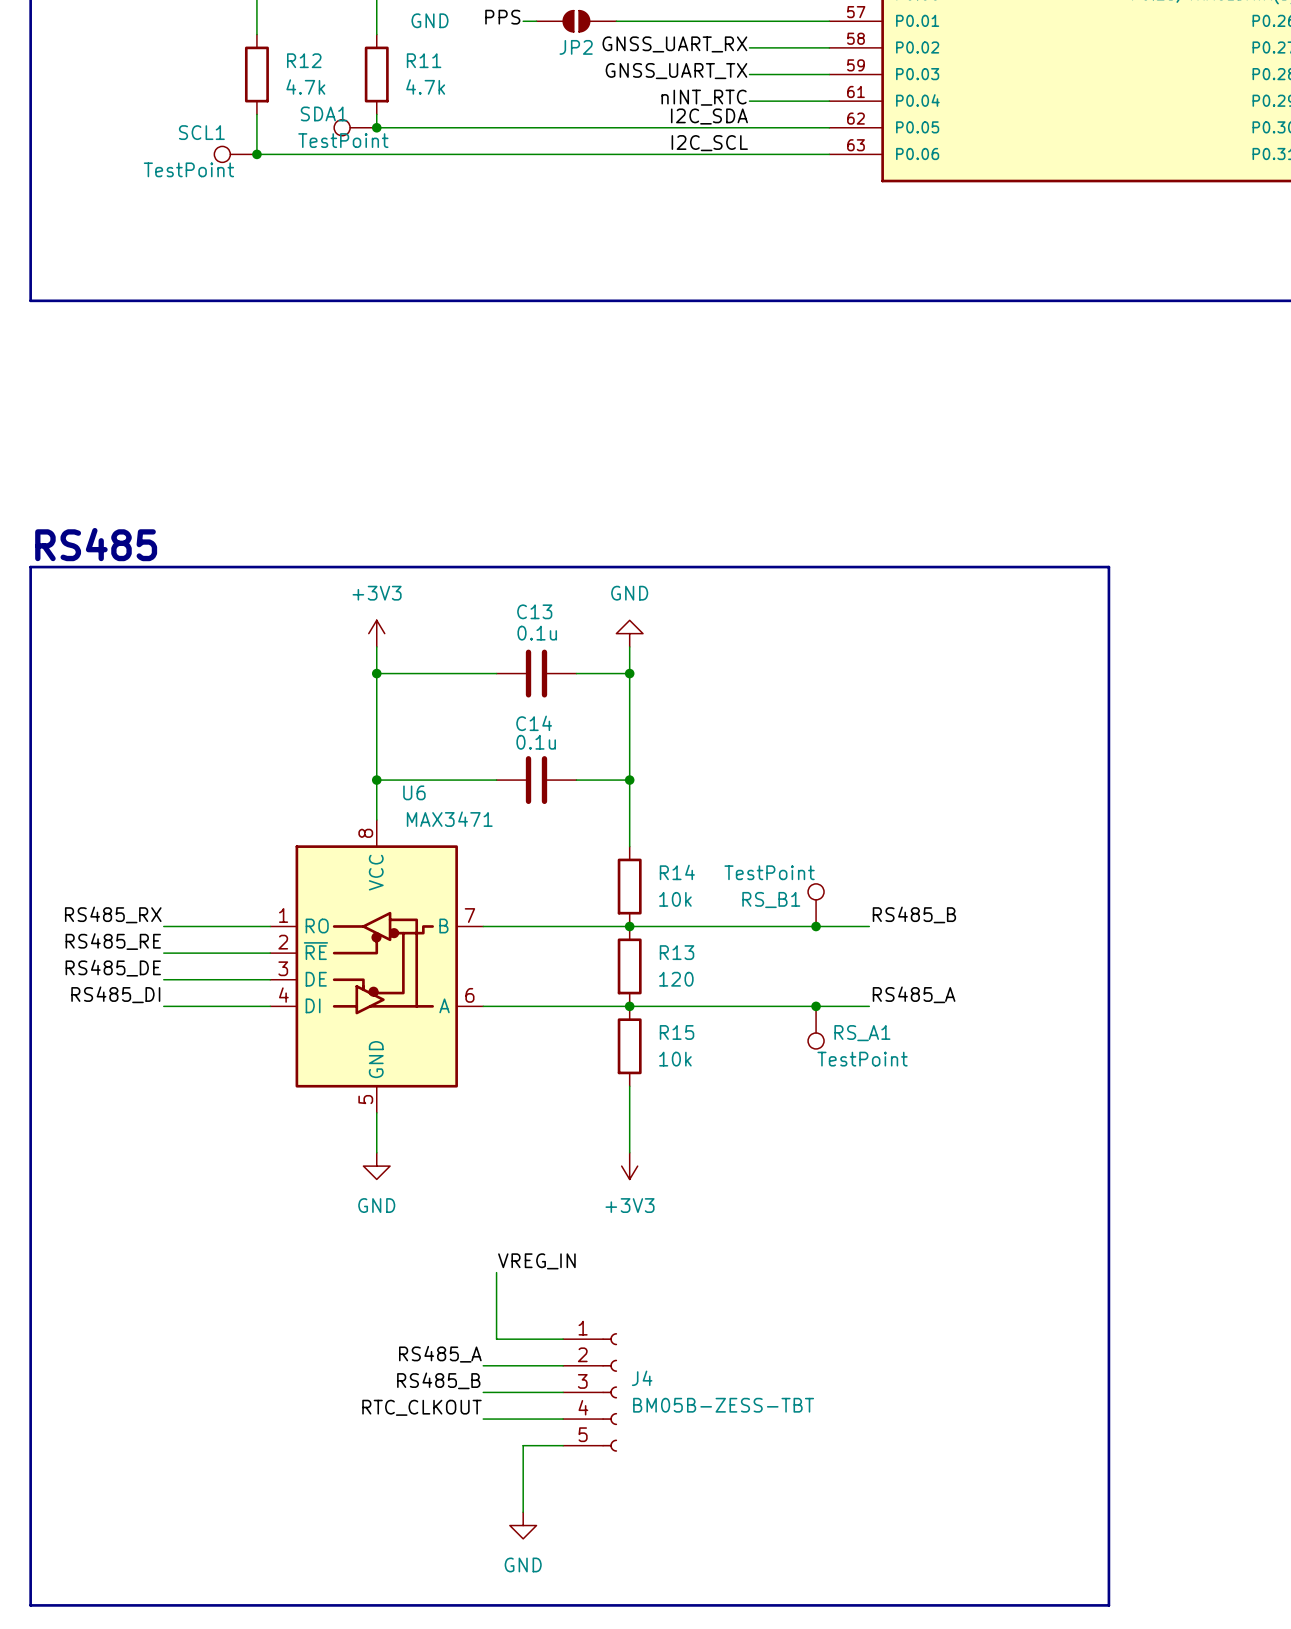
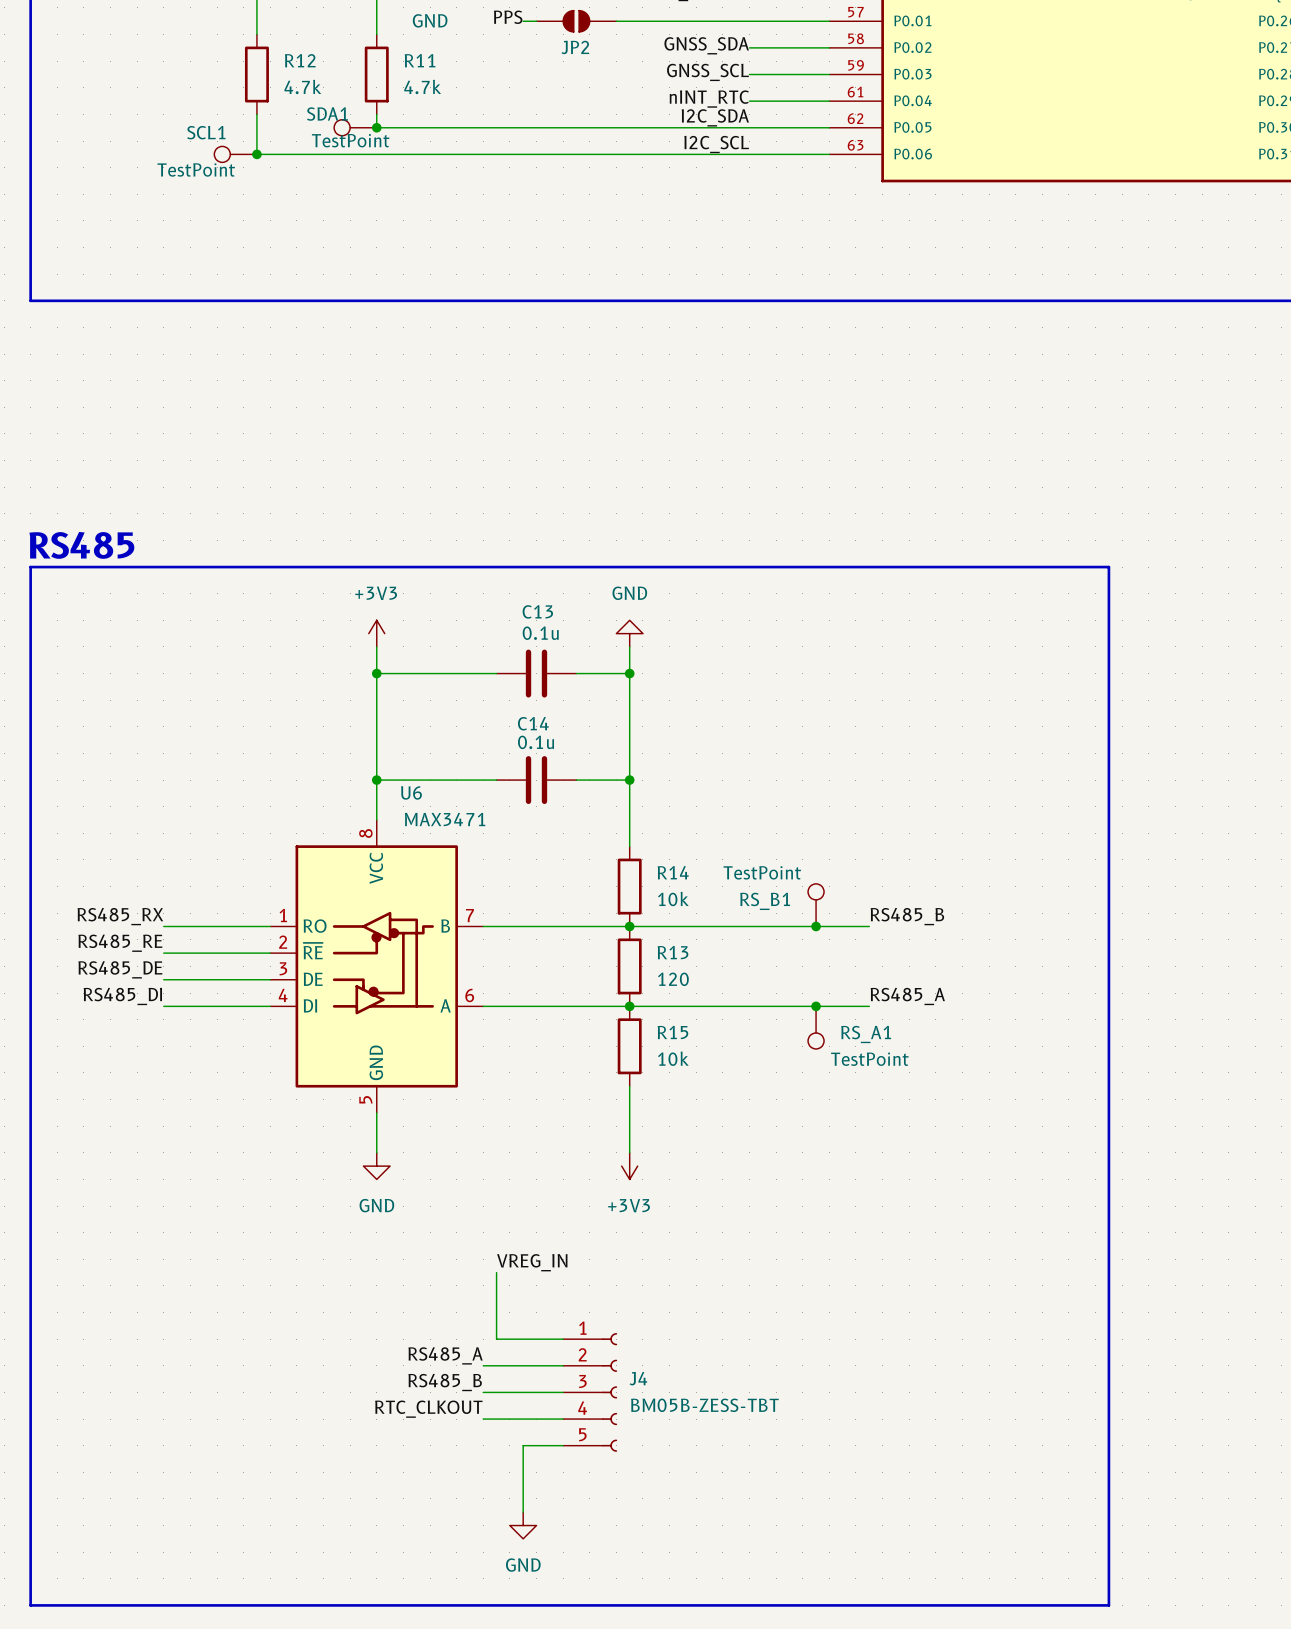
label: GNSS_UART_RX (674, 44) -> GNSS_SDA (706, 45)
label: GNSS_UART_TX (676, 71) -> GNSS_SCL (708, 72)

